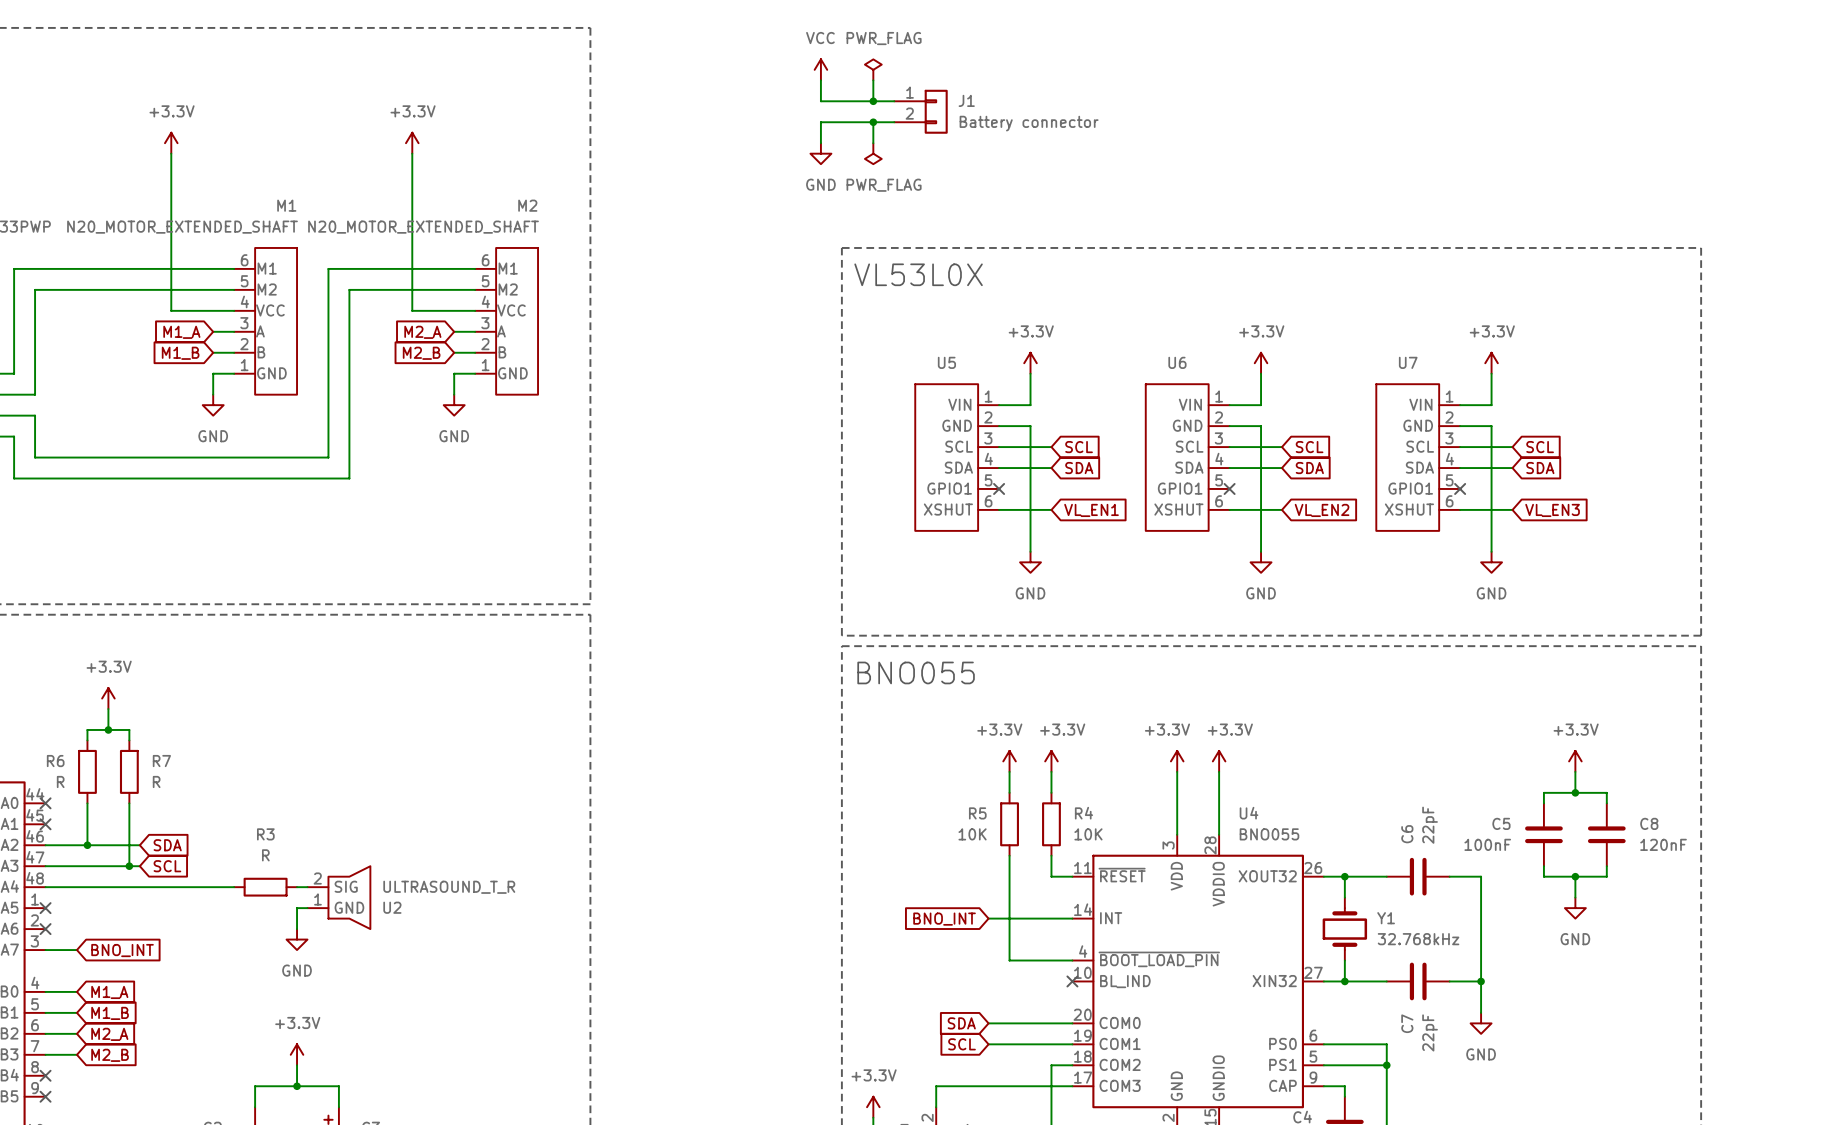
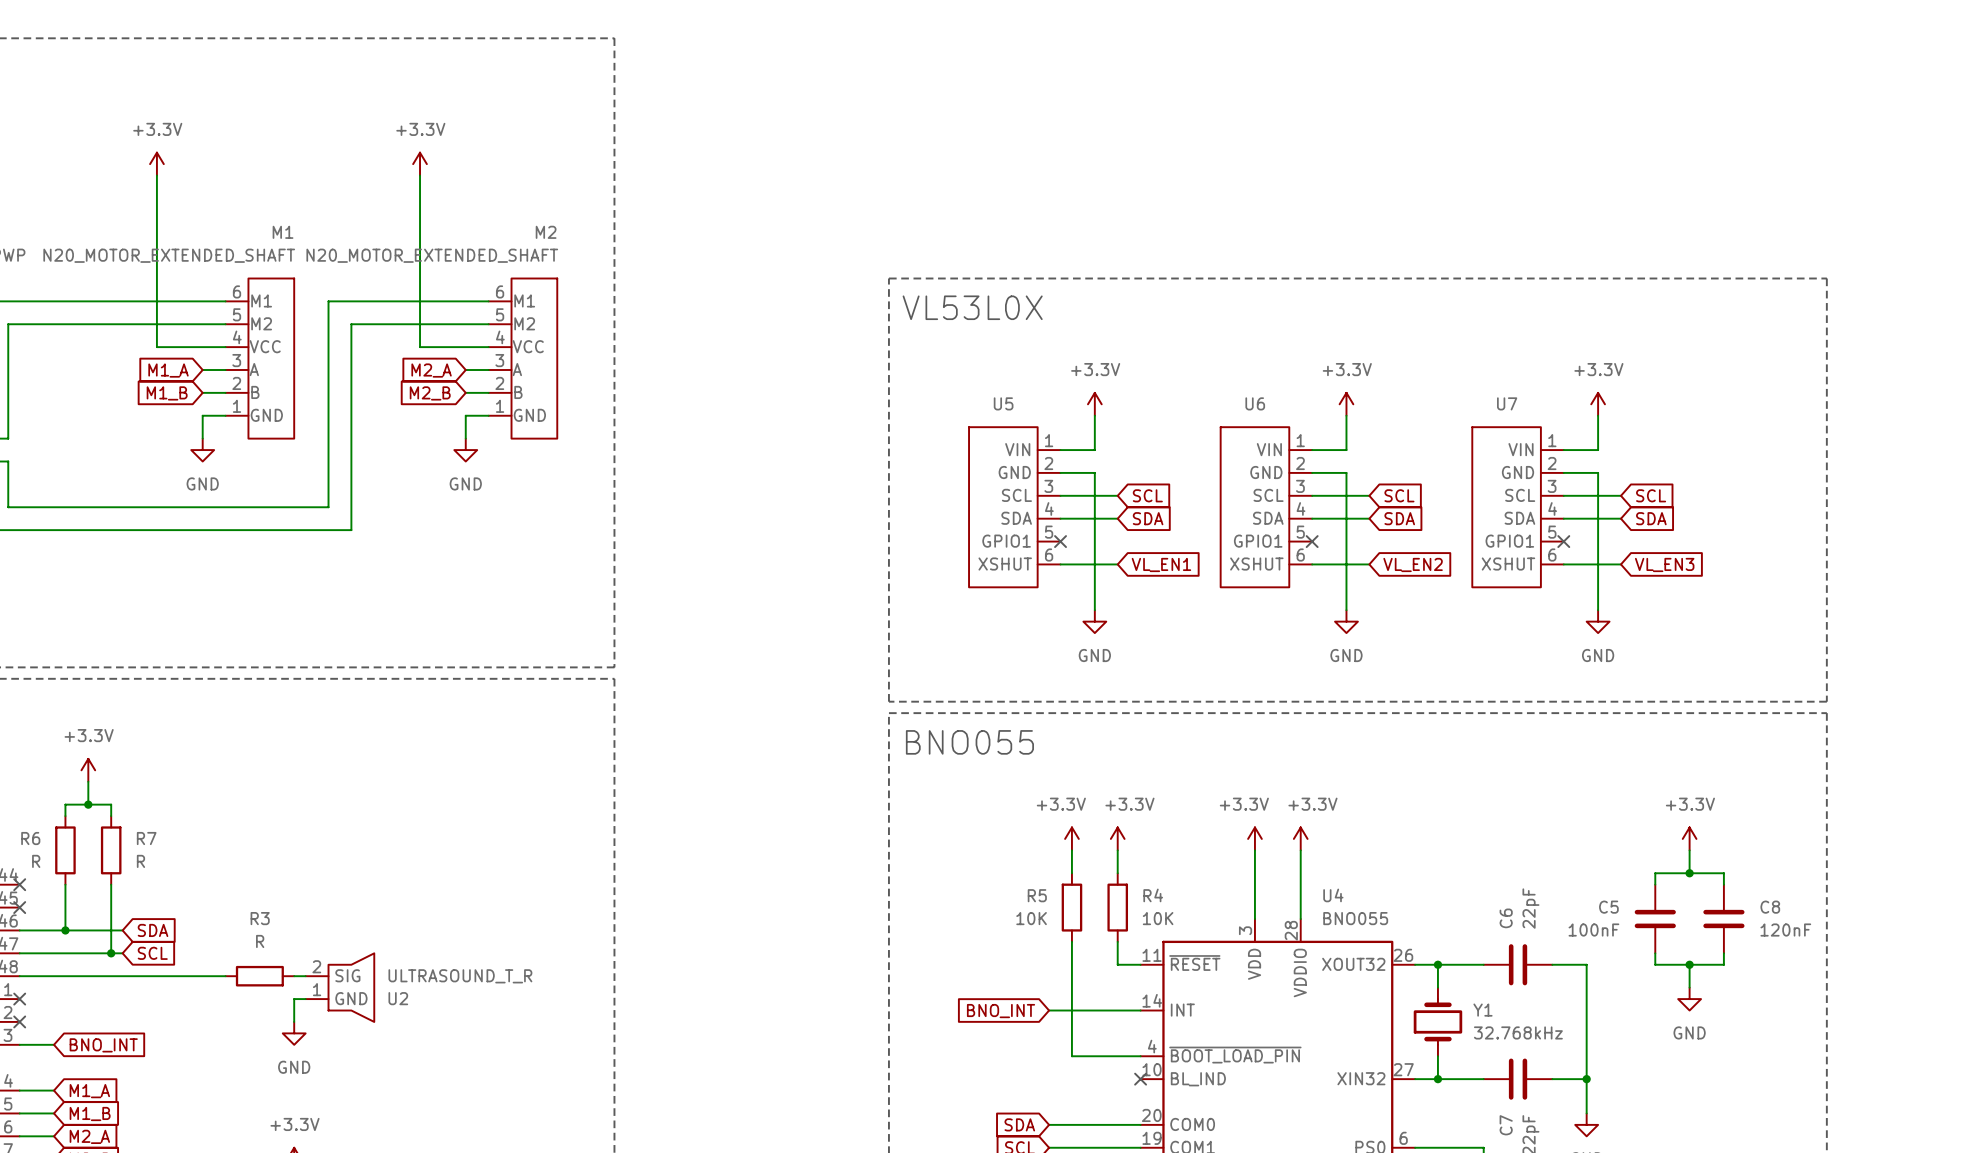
power symbol: VCC (820, 69) -> none
power symbol: PWR_FLAG (873, 69) -> none
wire: (820, 80) (820, 101) (894, 101) -> none
wire: (873, 80) (873, 101) -> none
junction: (873, 101) -> none
J1: Battery connector (921, 111) -> none
wire: (873, 122) (873, 143) -> none
junction: (873, 122) -> none
wire: (894, 122) (820, 122) (820, 143) -> none
power symbol: GND (820, 153) -> none
power symbol: PWR_FLAG (873, 153) -> none

